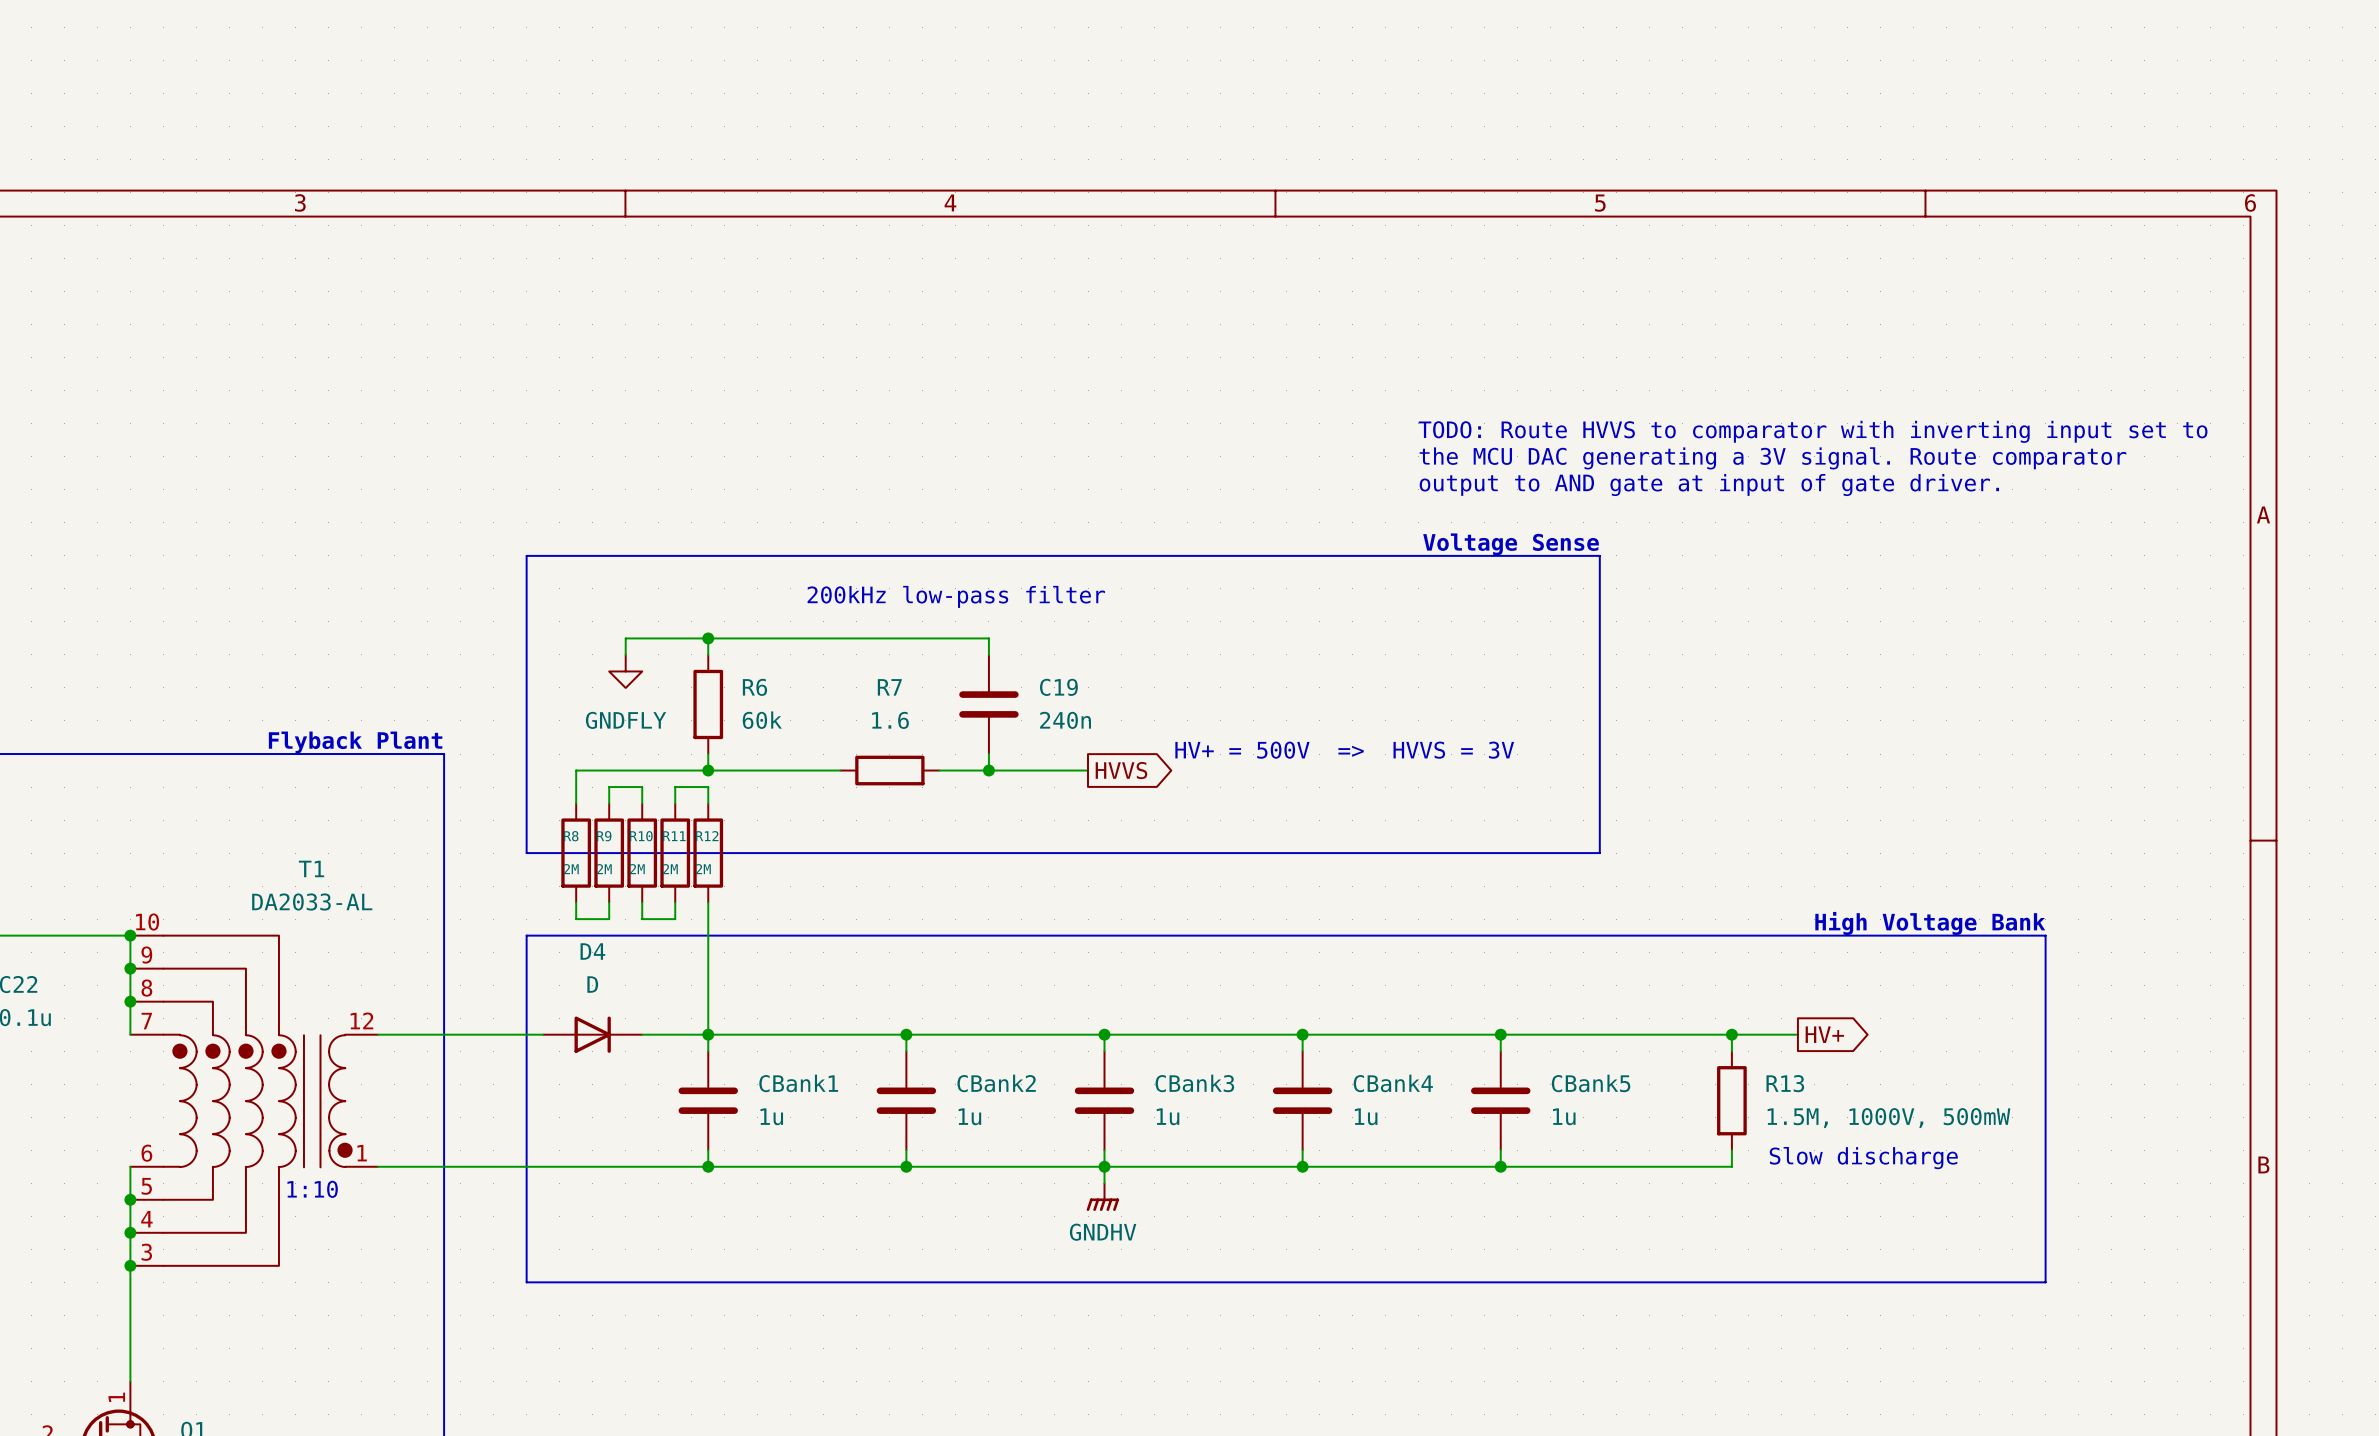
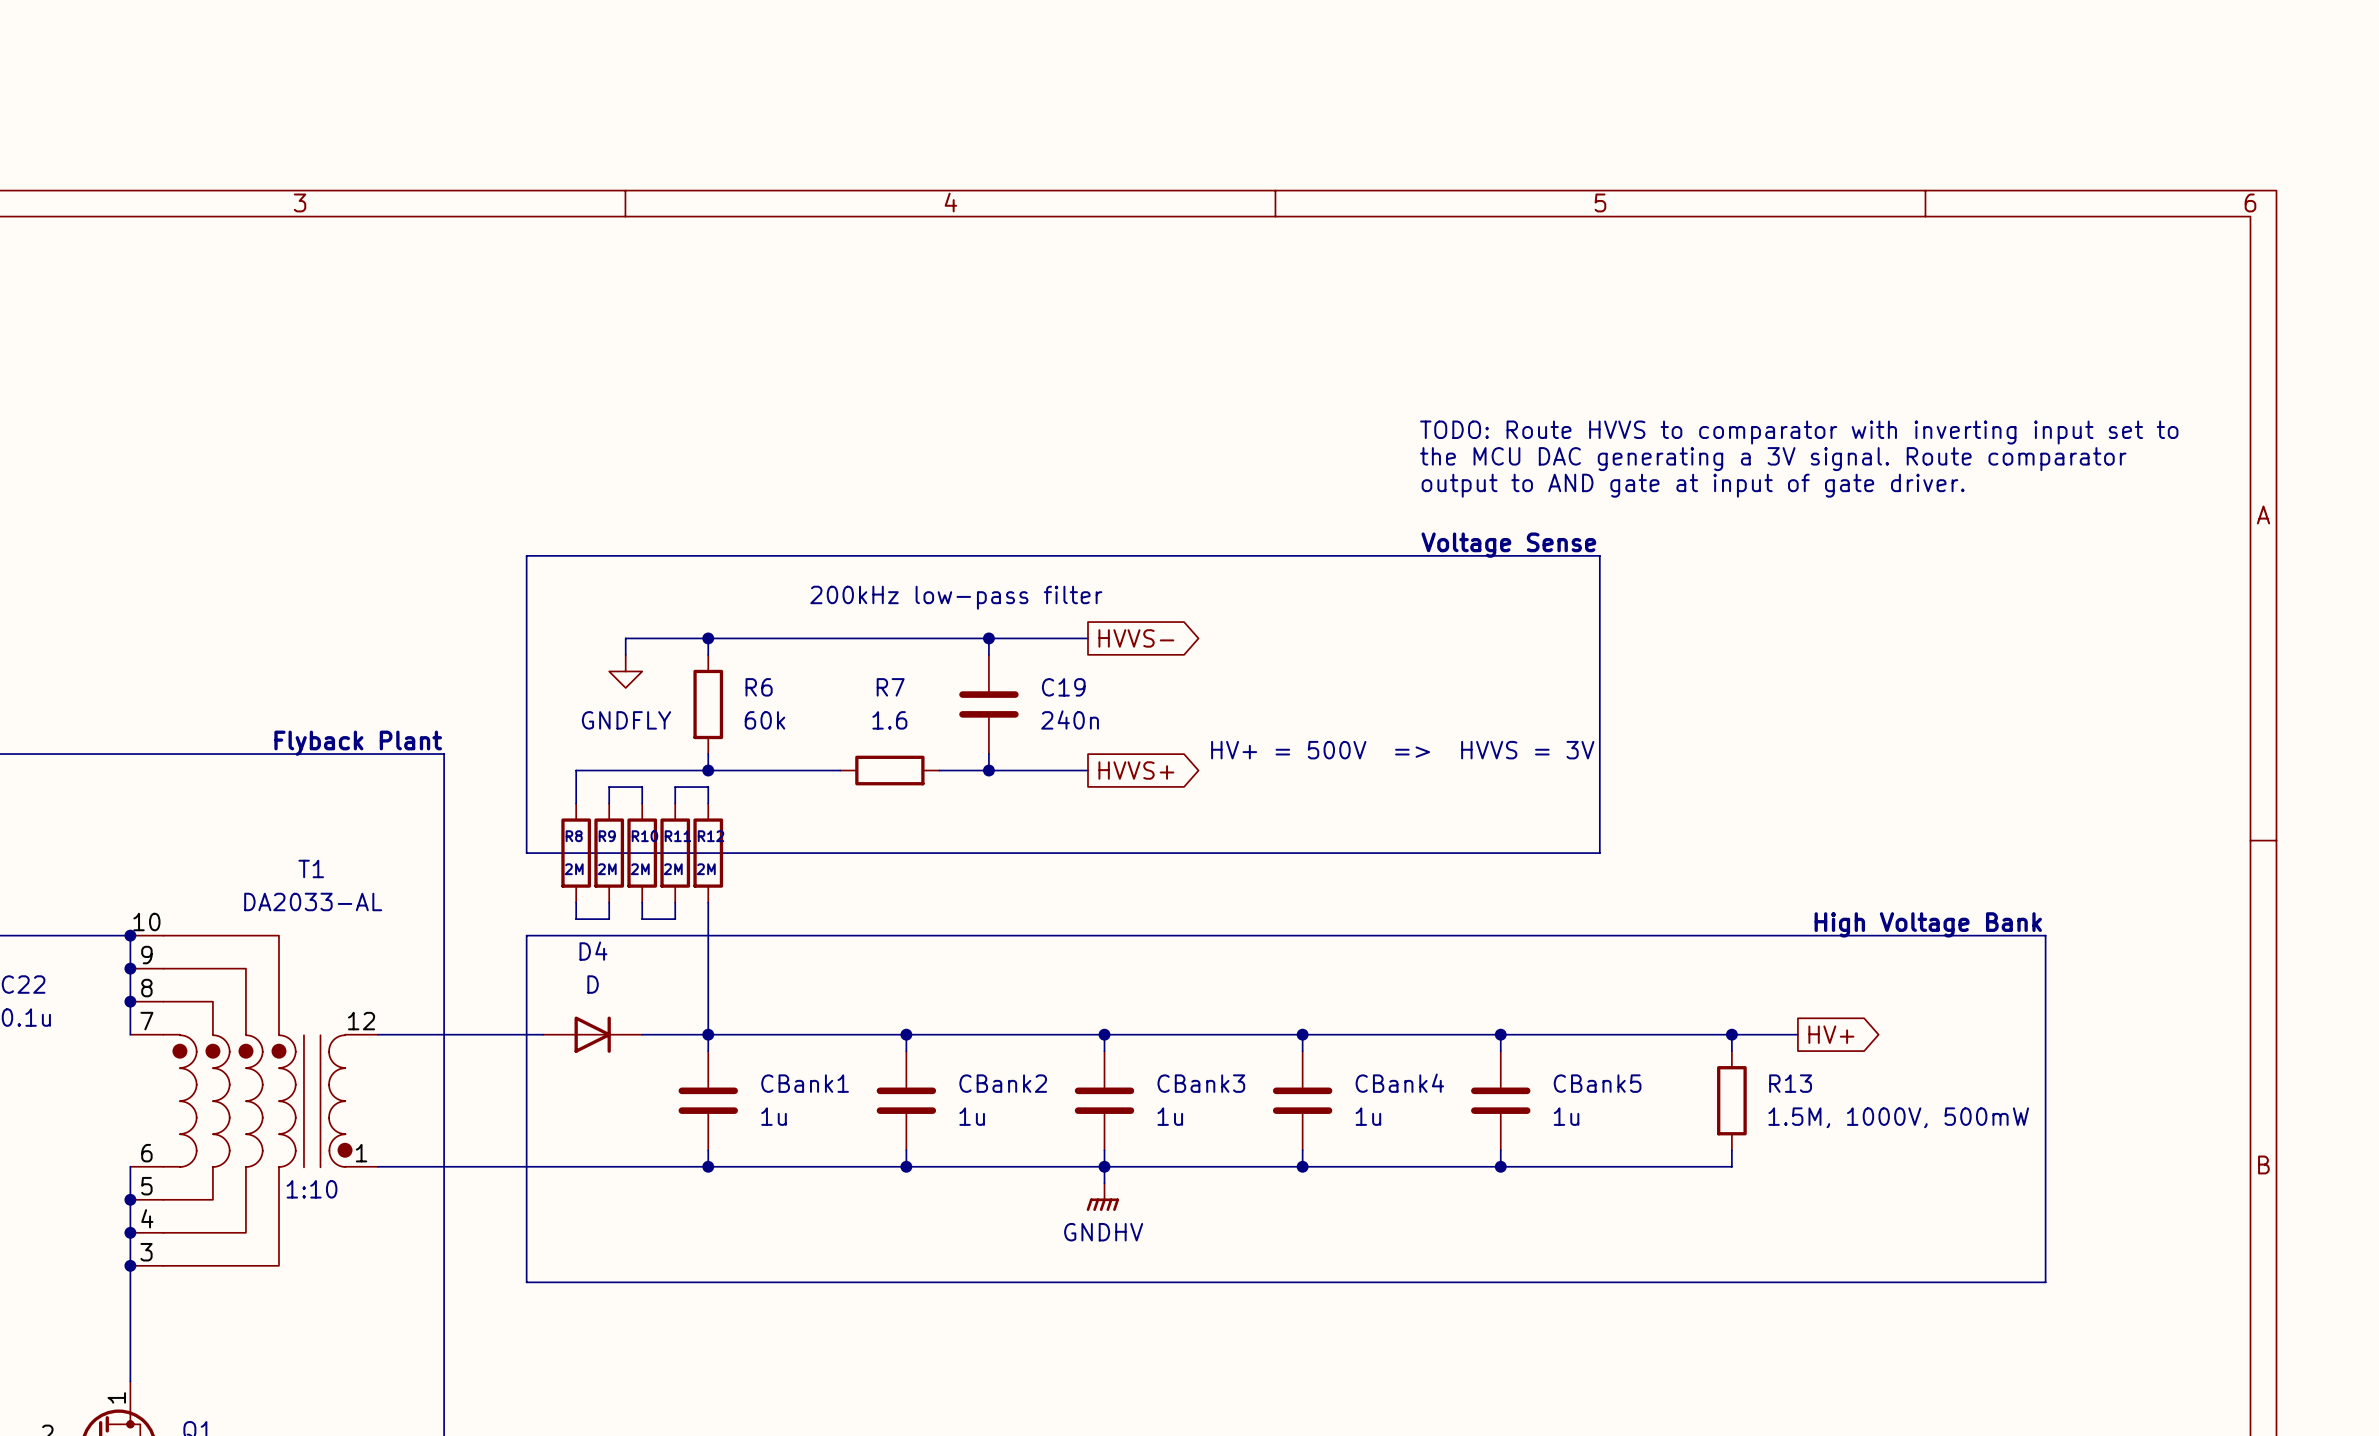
wire: none -> (988, 638) (1088, 638)
junction: none -> (988, 638)
global label: none -> HVVS- (1136, 638)
text position: HV+ = 500V => HVVS = 3V (1344, 750) -> HV+ = 500V => HVVS = 3V (1402, 750)
global label: HVVS (1121, 770) -> HVVS+ (1136, 770)
text: Slow discharge (1863, 1158) -> none

